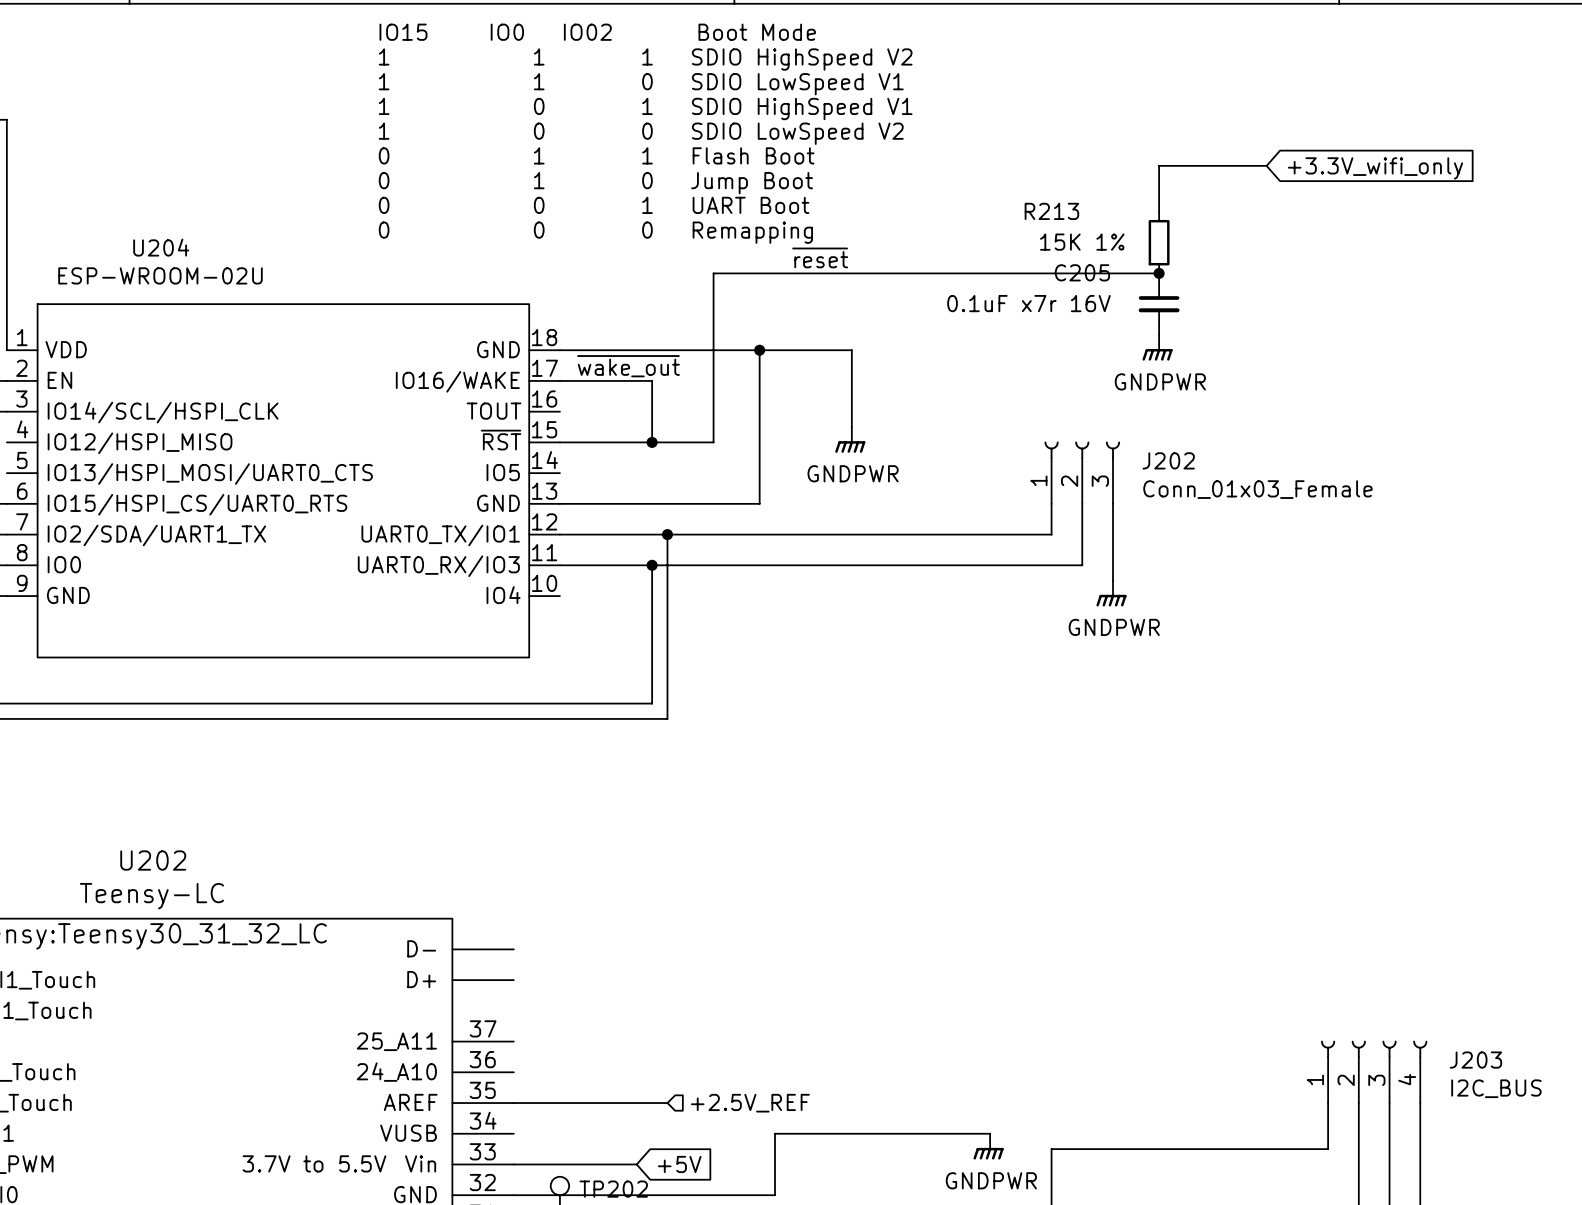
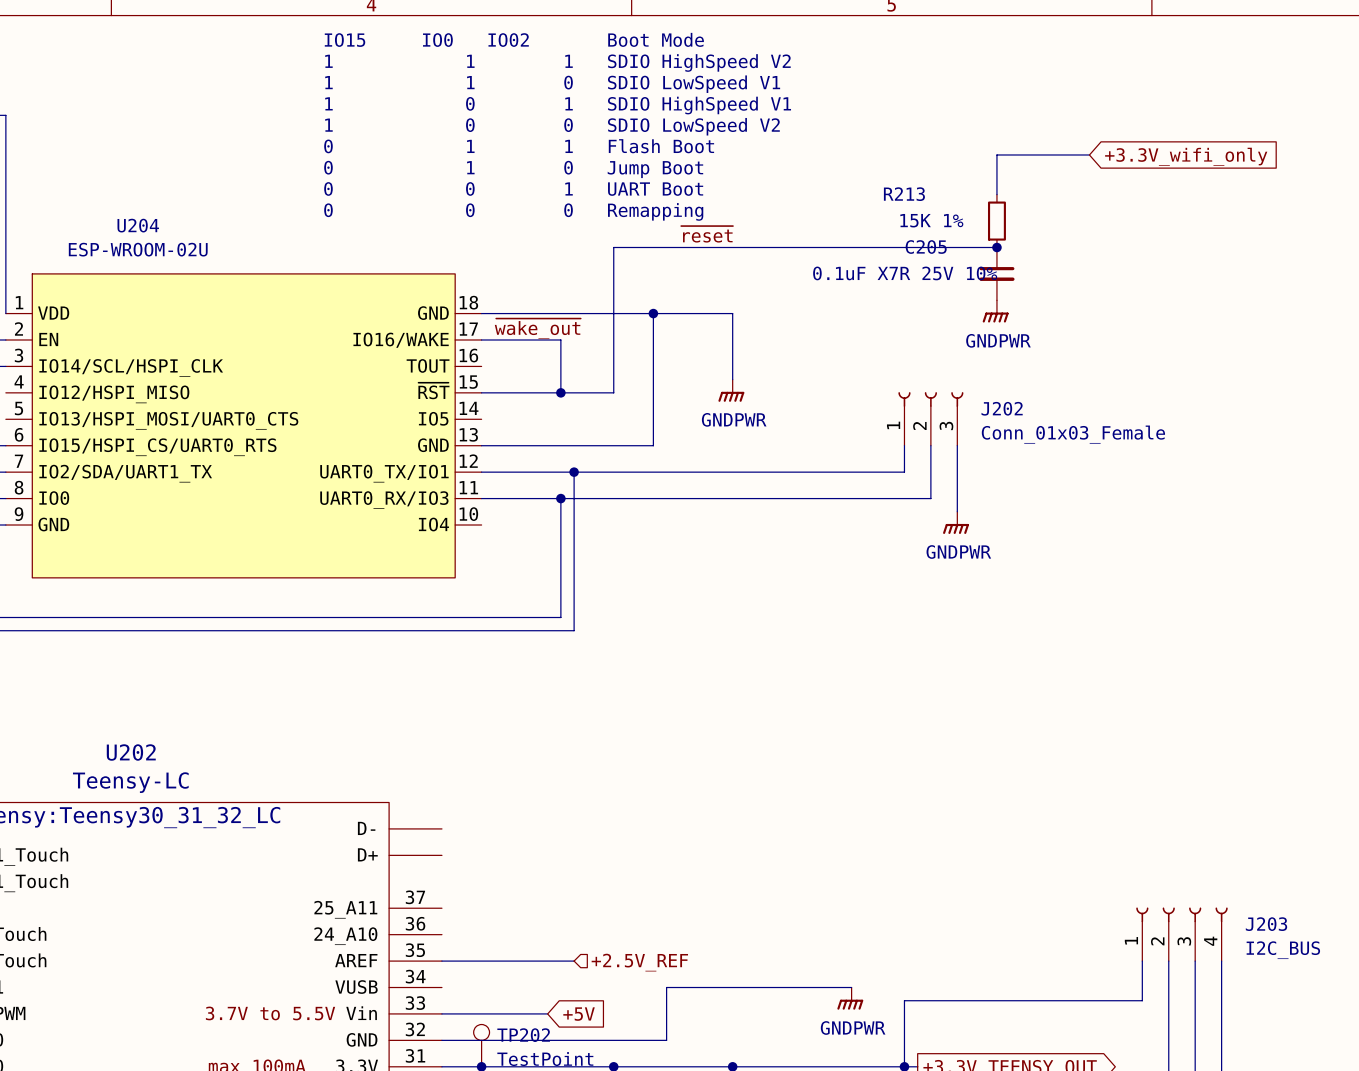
C205 value: 0.1uF x7r 16V (1028, 303) -> 0.1uF X7R 25V 10% (905, 273)

